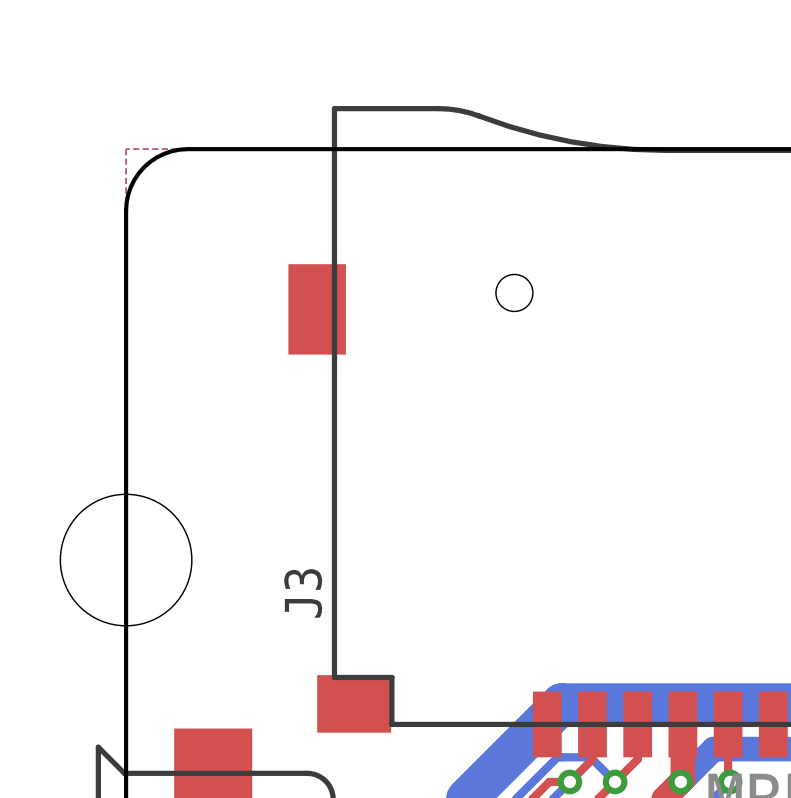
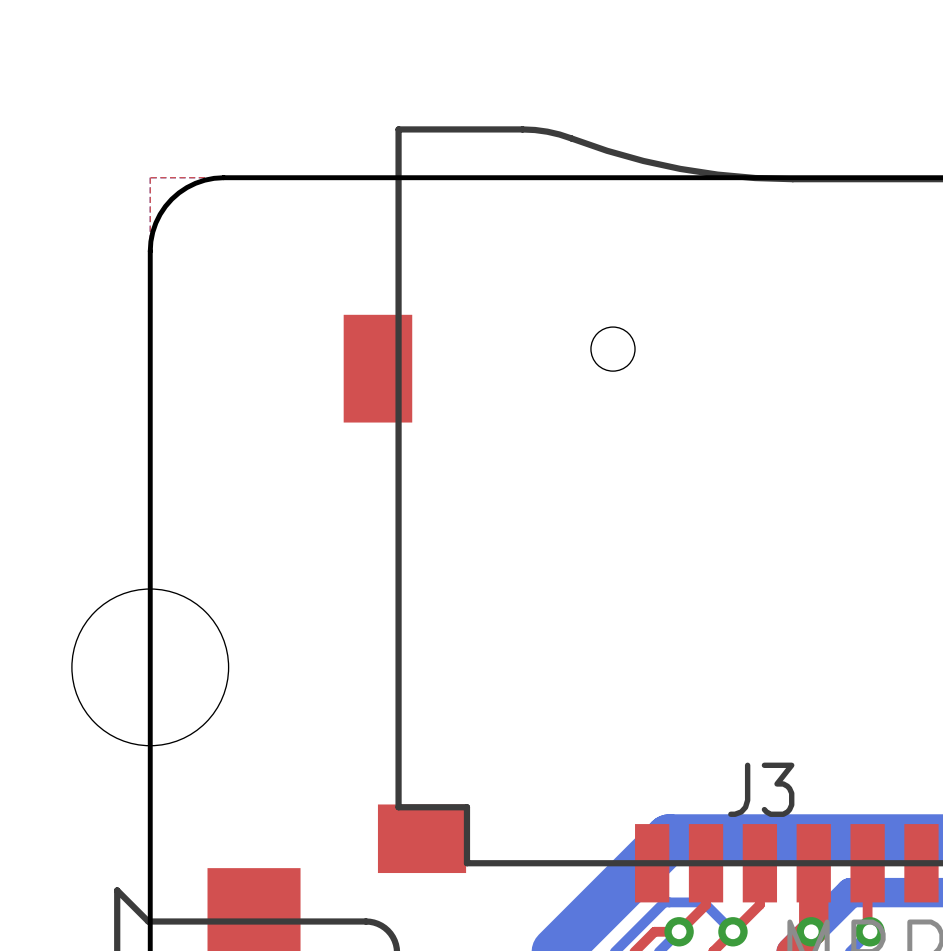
J3 name rotation: 0° (303, 593) -> 90° clockwise (761, 789)
J3 name position: J3 (303, 593) -> J3 (761, 789)

